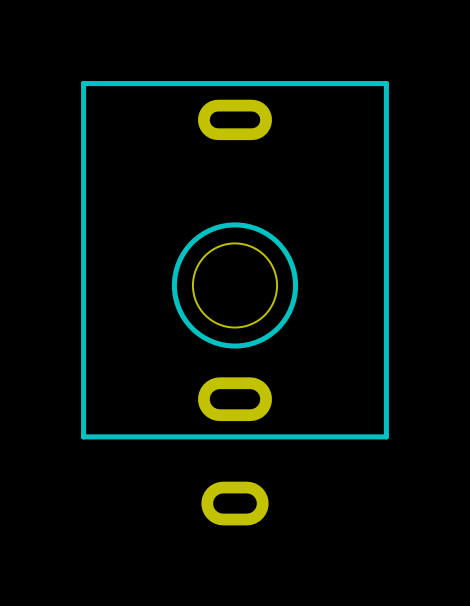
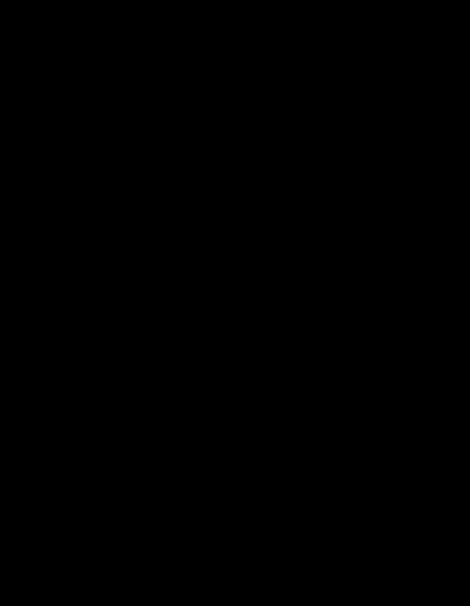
part: (234, 303) -> none

